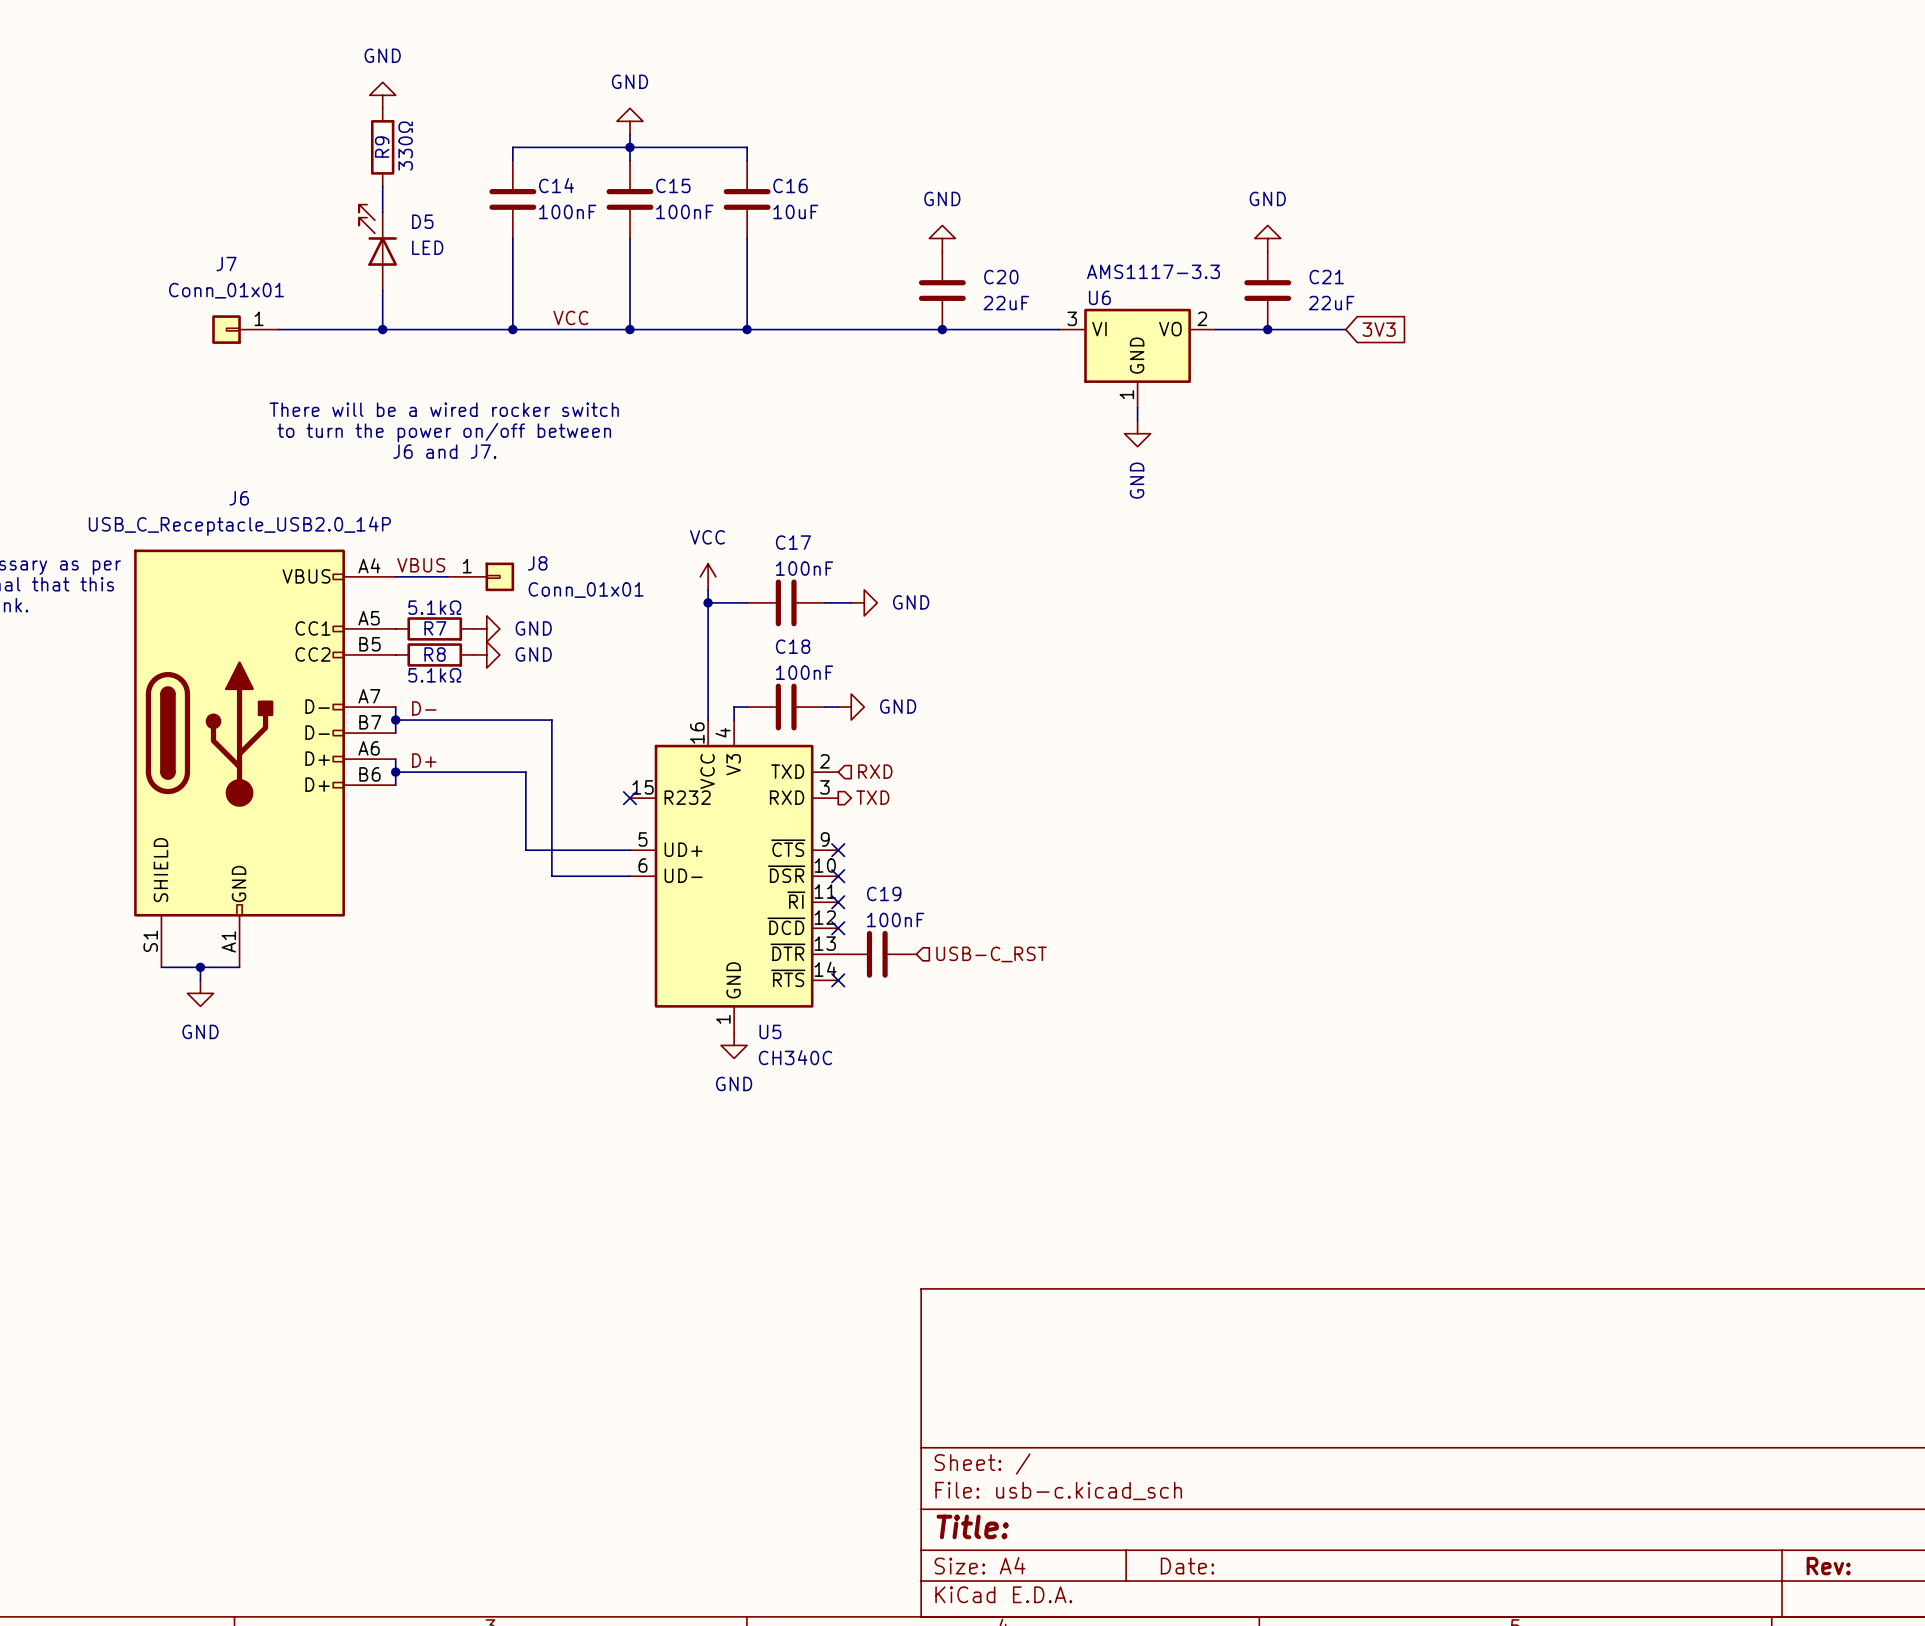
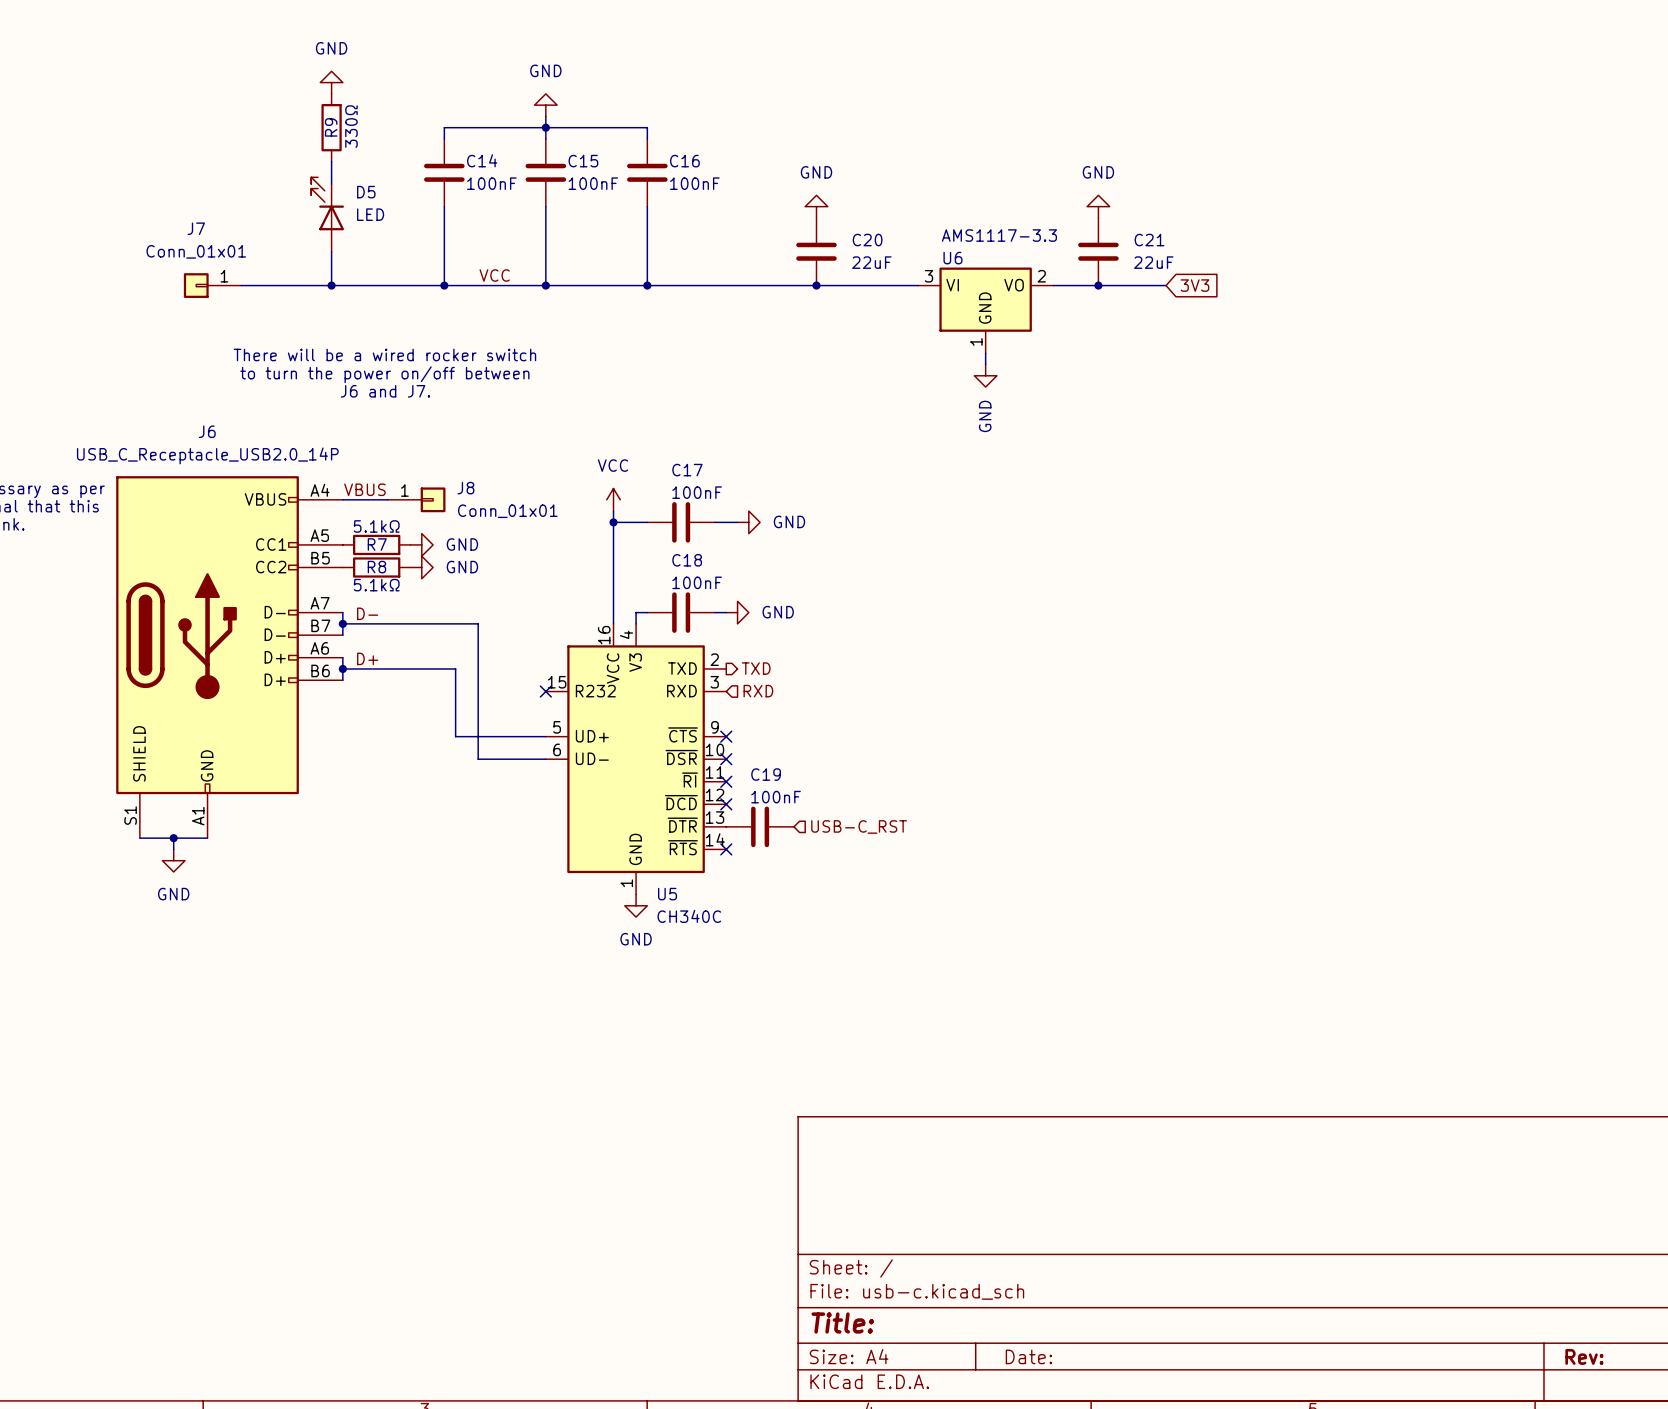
C16 value: 10uF (795, 211) -> 100nF (694, 183)
hierarchical label shape: input (875, 771) -> output (756, 668)
hierarchical label: RXD (875, 771) -> TXD (756, 668)
hierarchical label shape: output (872, 797) -> input (758, 691)
hierarchical label: TXD (872, 797) -> RXD (758, 691)

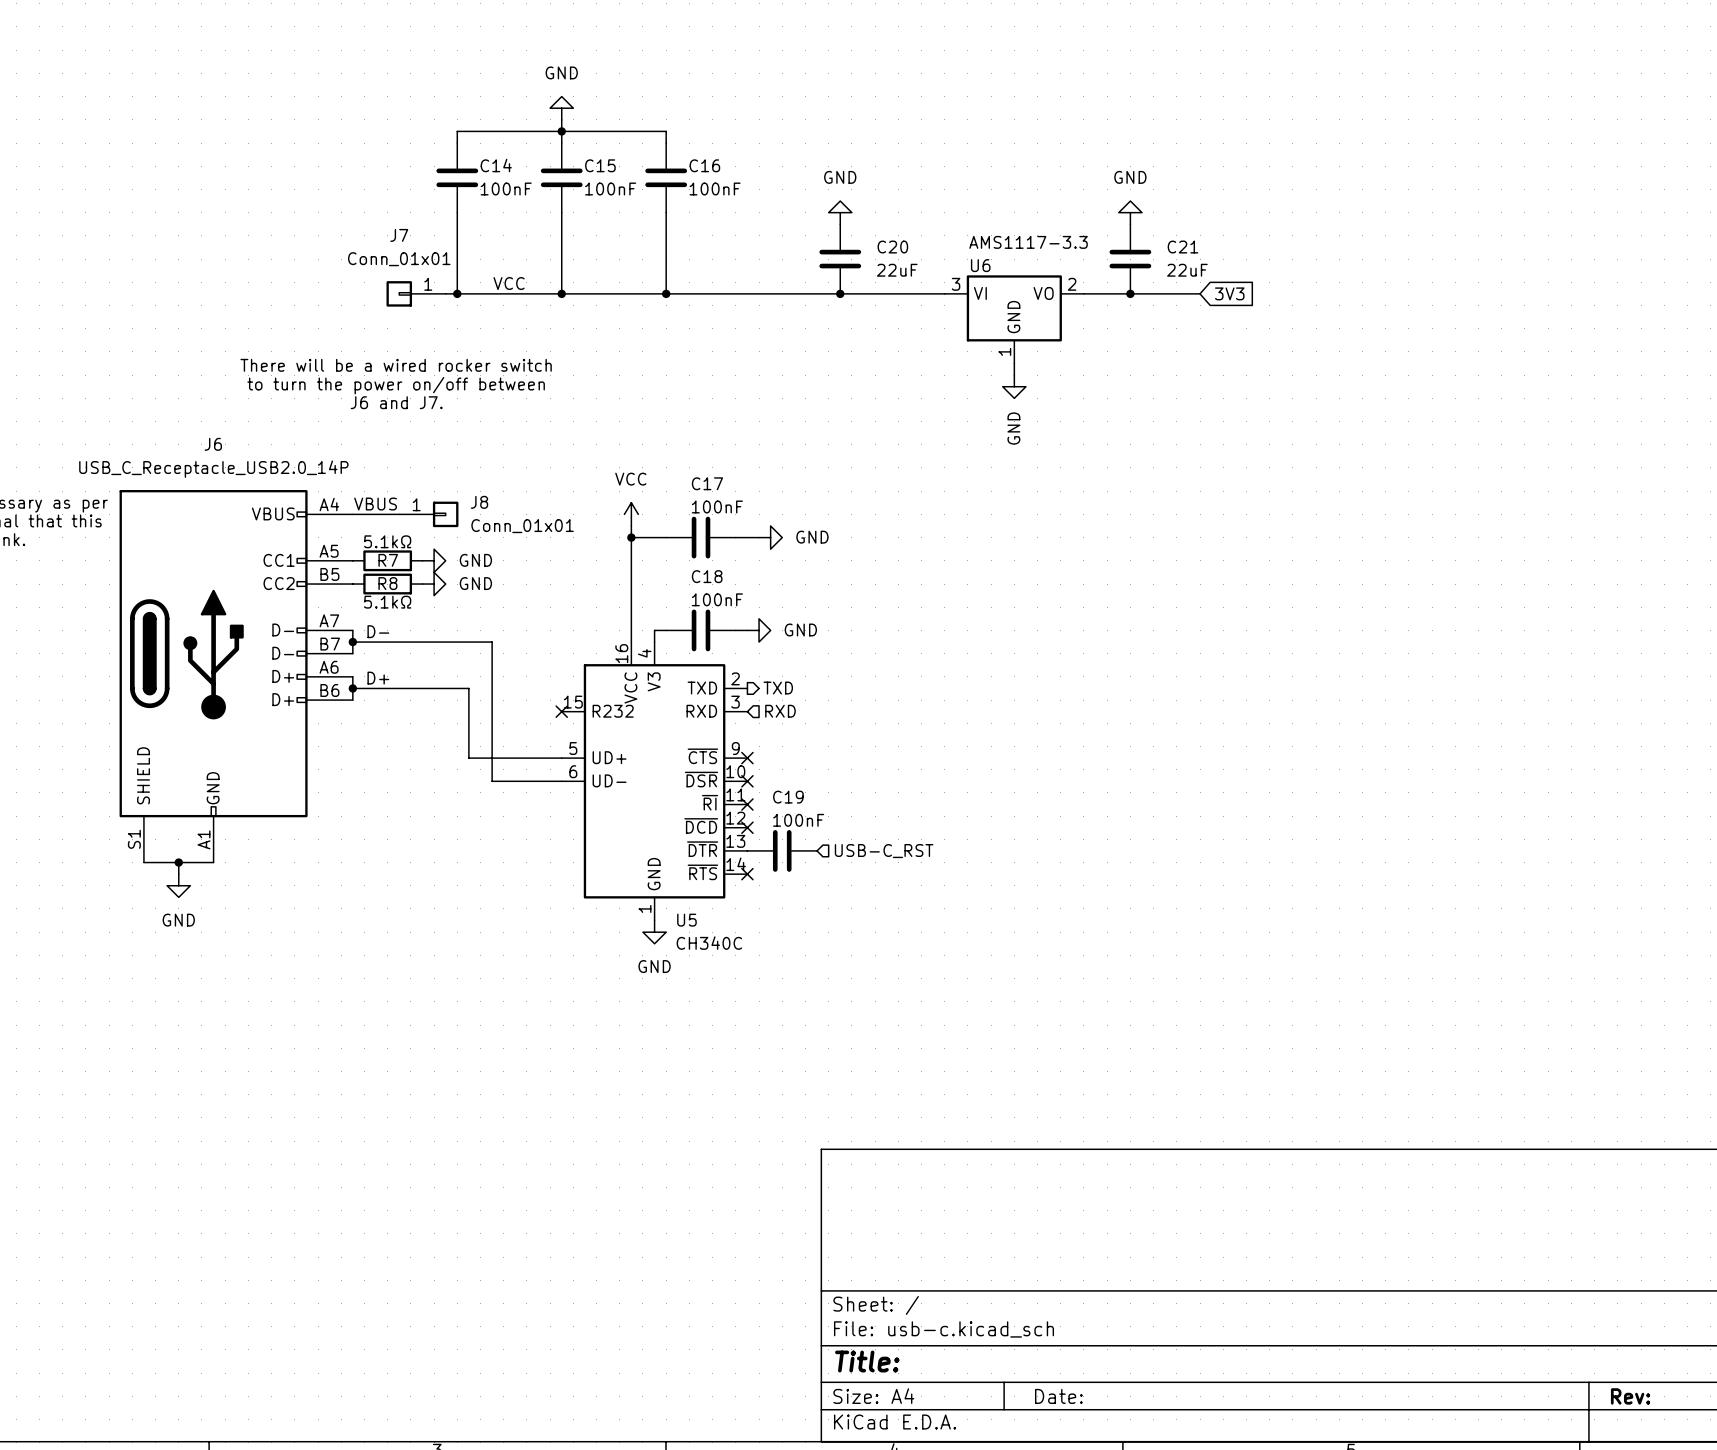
power symbol: GND (331, 82) -> none
R9: 330Ω (331, 127) -> none
wire: (331, 161) (331, 184) -> none
D5: LED (327, 214) -> none
wire: (331, 251) (331, 285) -> none
J7 position: (212, 285) -> (416, 293)
wire: (241, 285) (433, 285) -> none
junction: (331, 285) -> none

